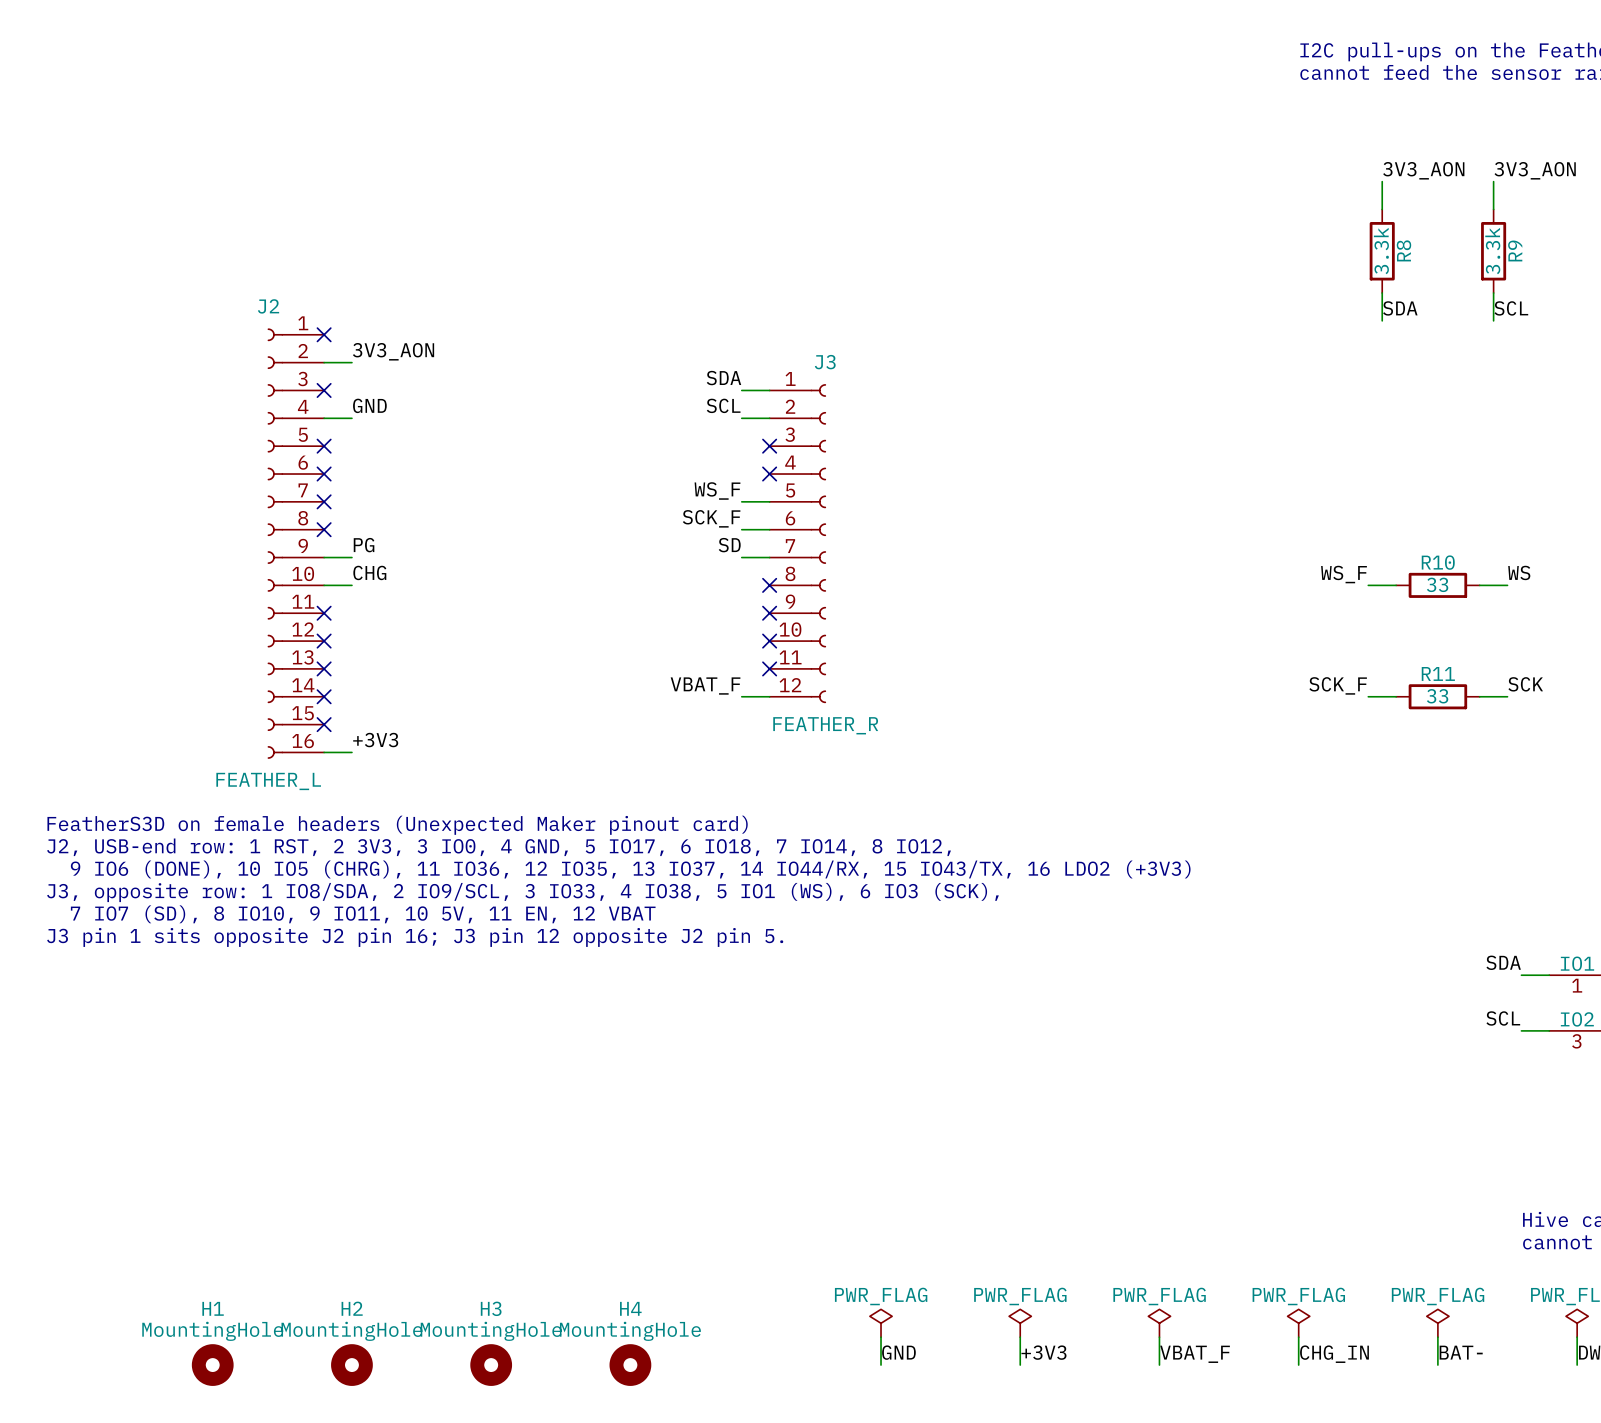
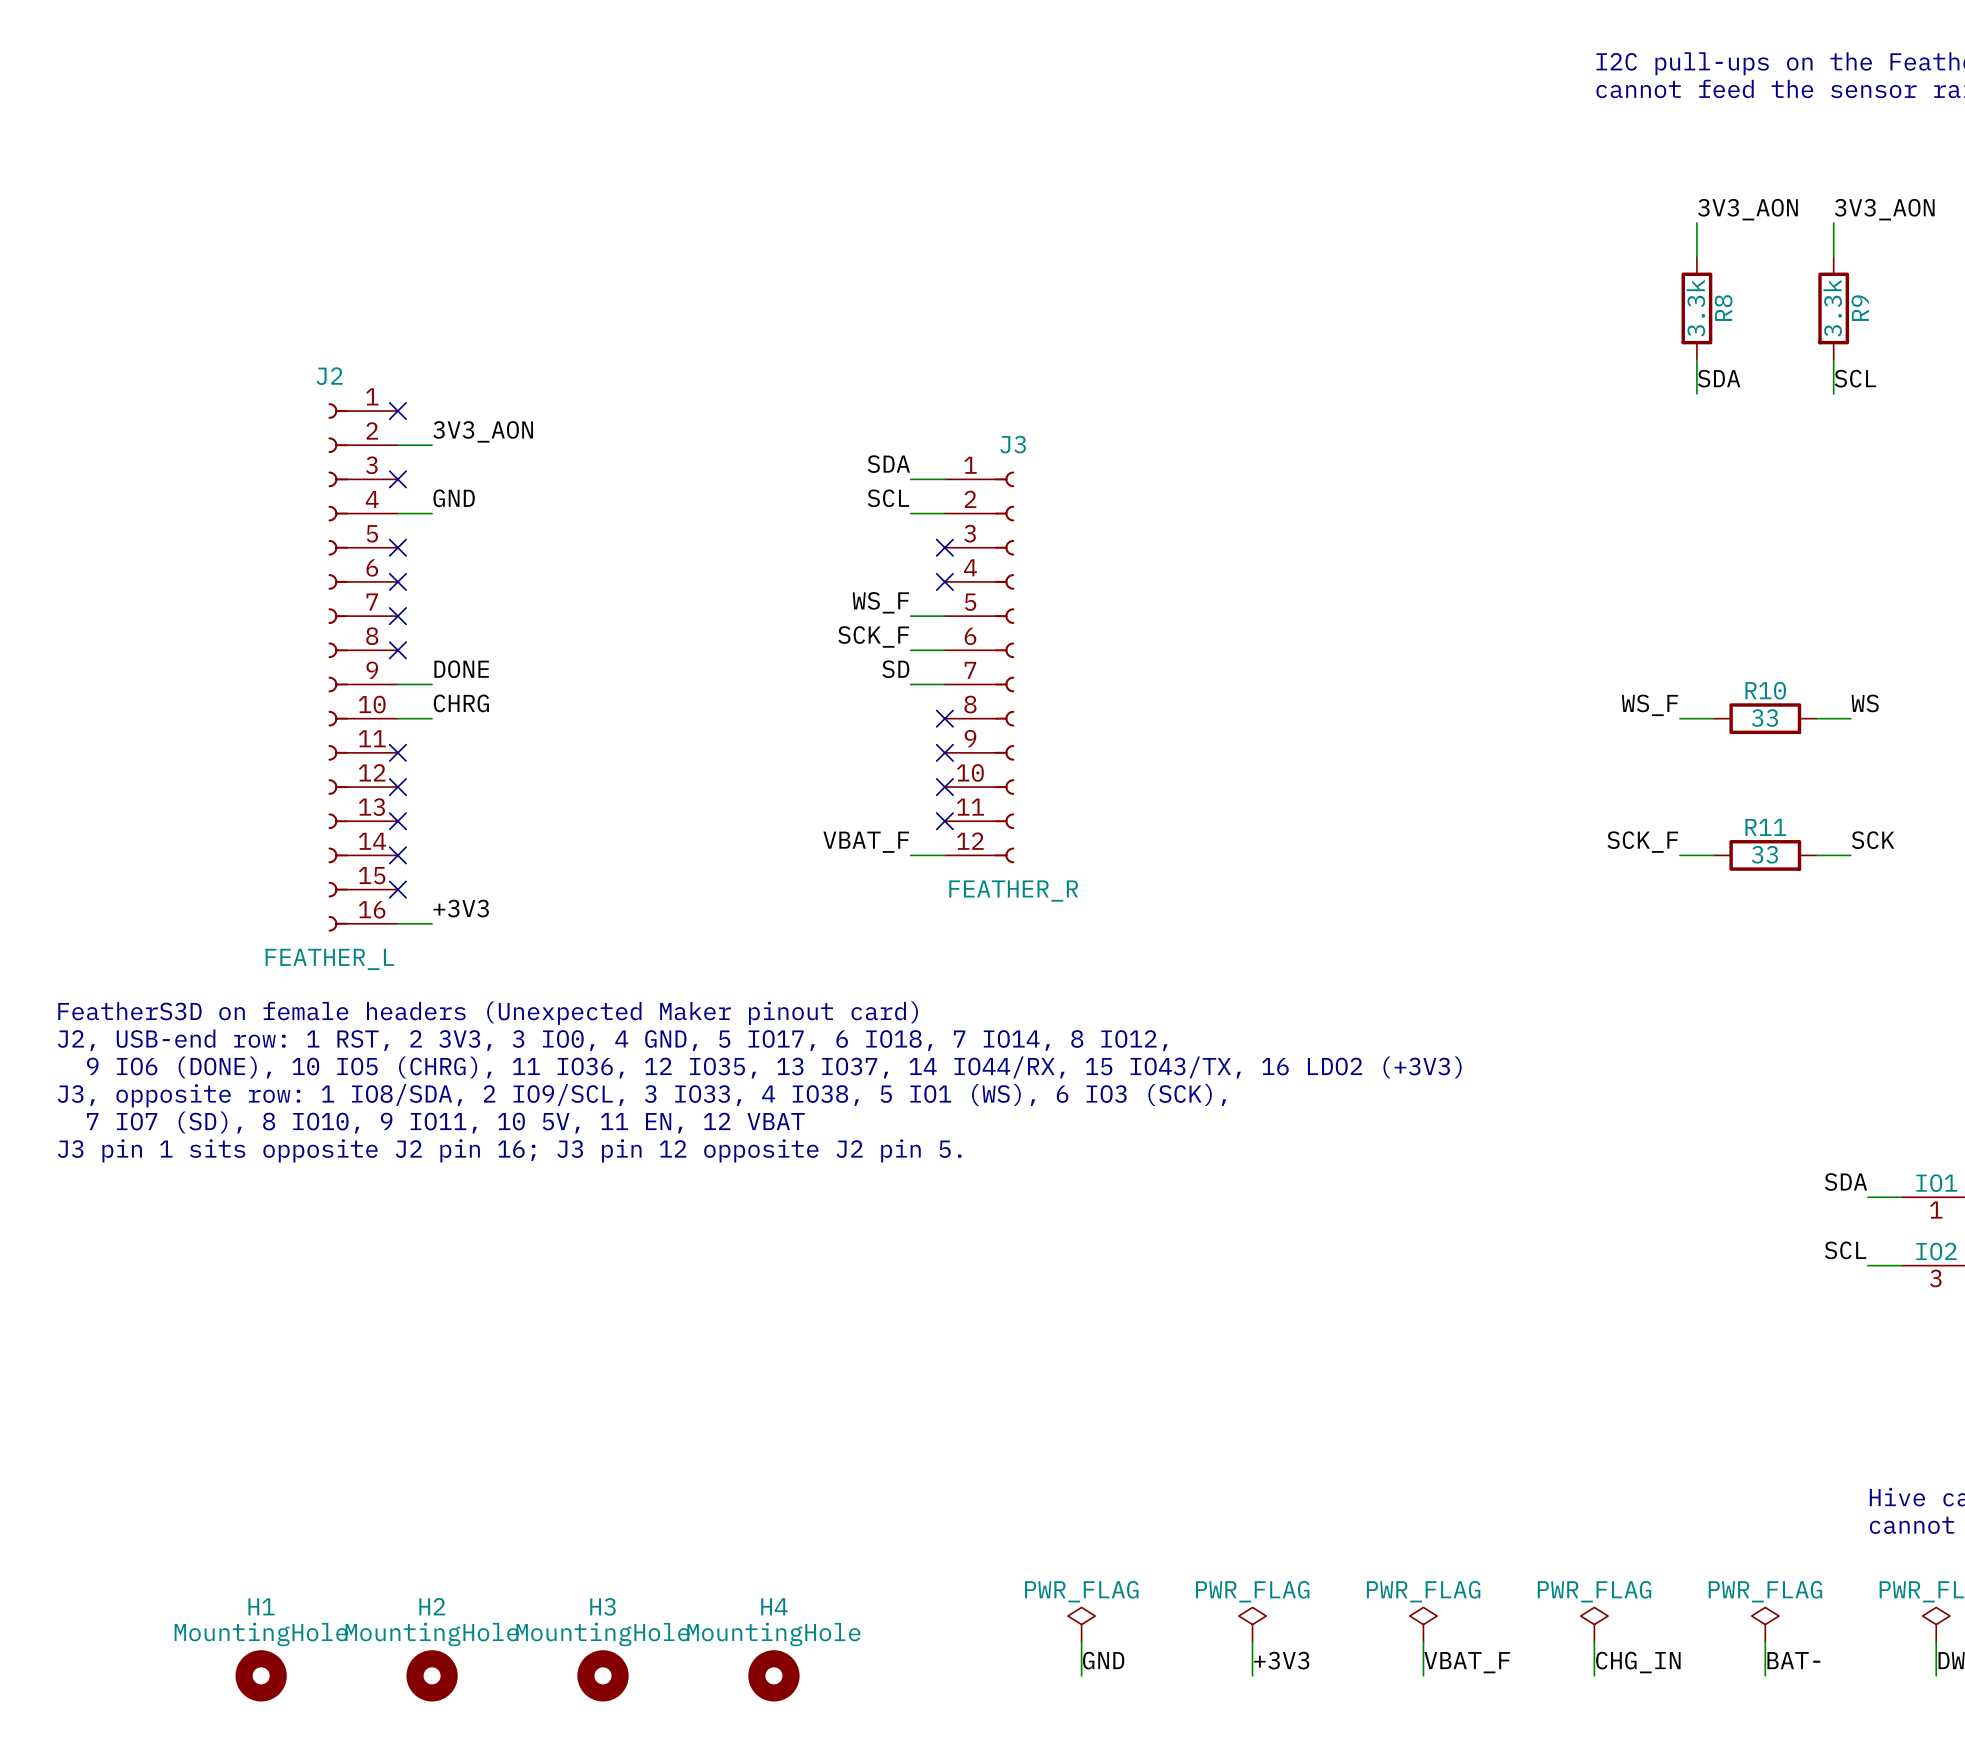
label: PG (364, 545) -> DONE (461, 669)
label: CHG (369, 572) -> CHRG (461, 703)

